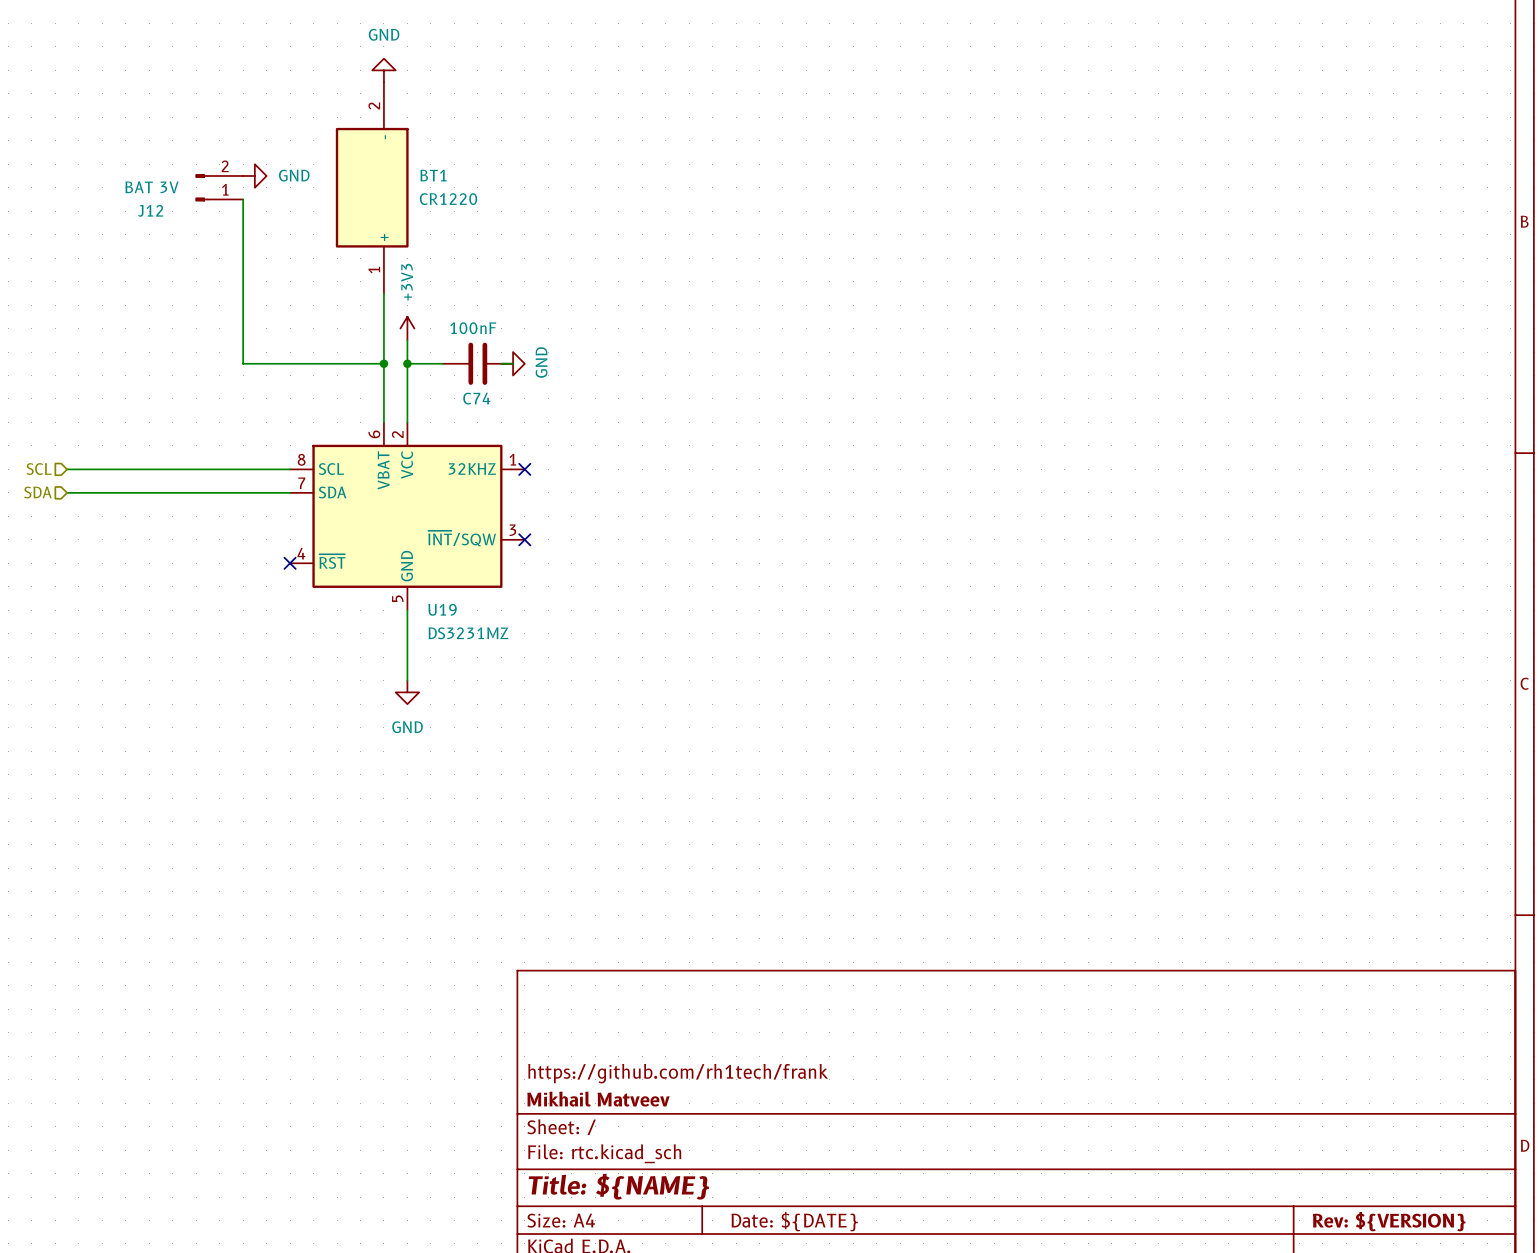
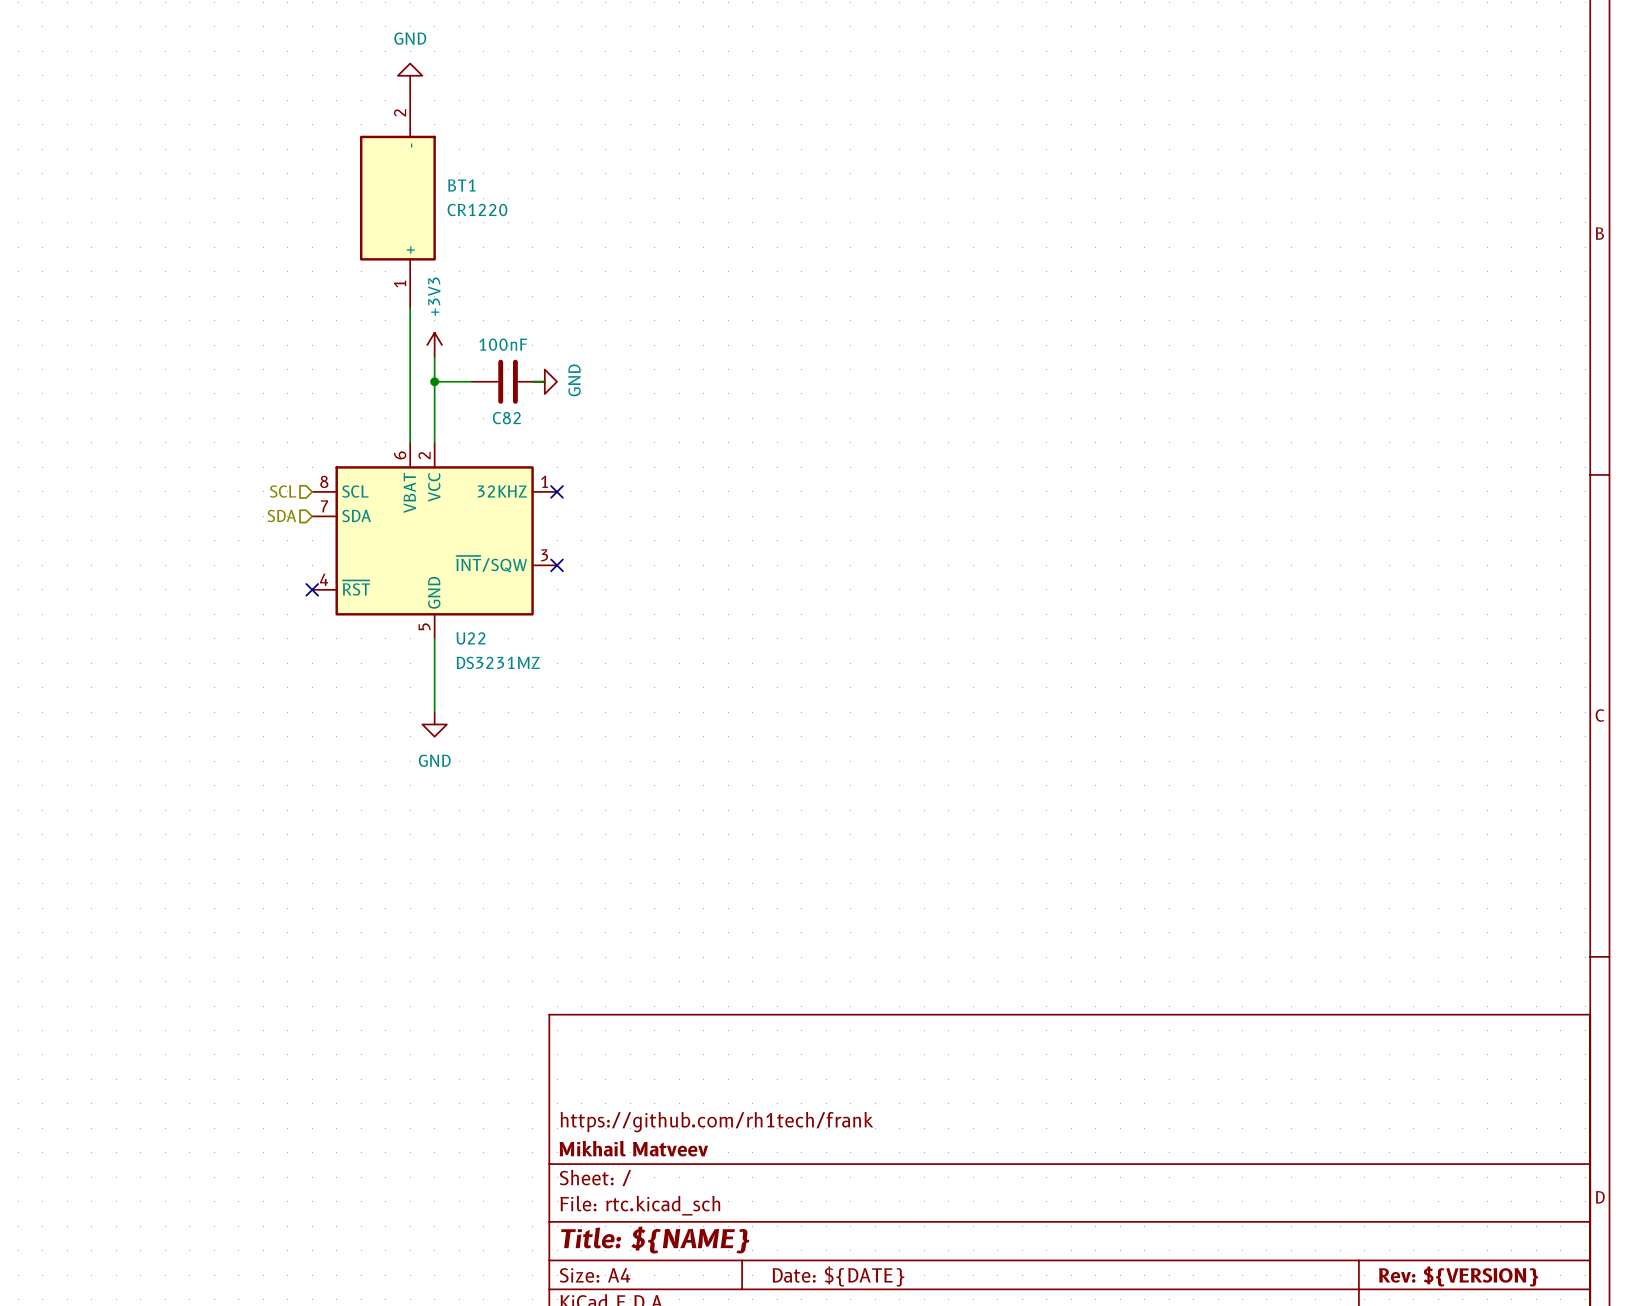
power symbol: GND (254, 176) -> none
J12: BAT 3V (219, 187) -> none
wire: (243, 199) (243, 363) (383, 363) -> none
junction: (383, 363) -> none
C74 name: C74 (476, 398) -> C82 (506, 418)
hierarchical label position: SCL (39, 469) -> SCL (283, 491)
wire: (67, 469) (290, 469) -> none
hierarchical label position: SDA (37, 492) -> SDA (281, 516)
wire: (67, 492) (290, 492) -> none
U19 name: U19 (442, 609) -> U22 (471, 638)

